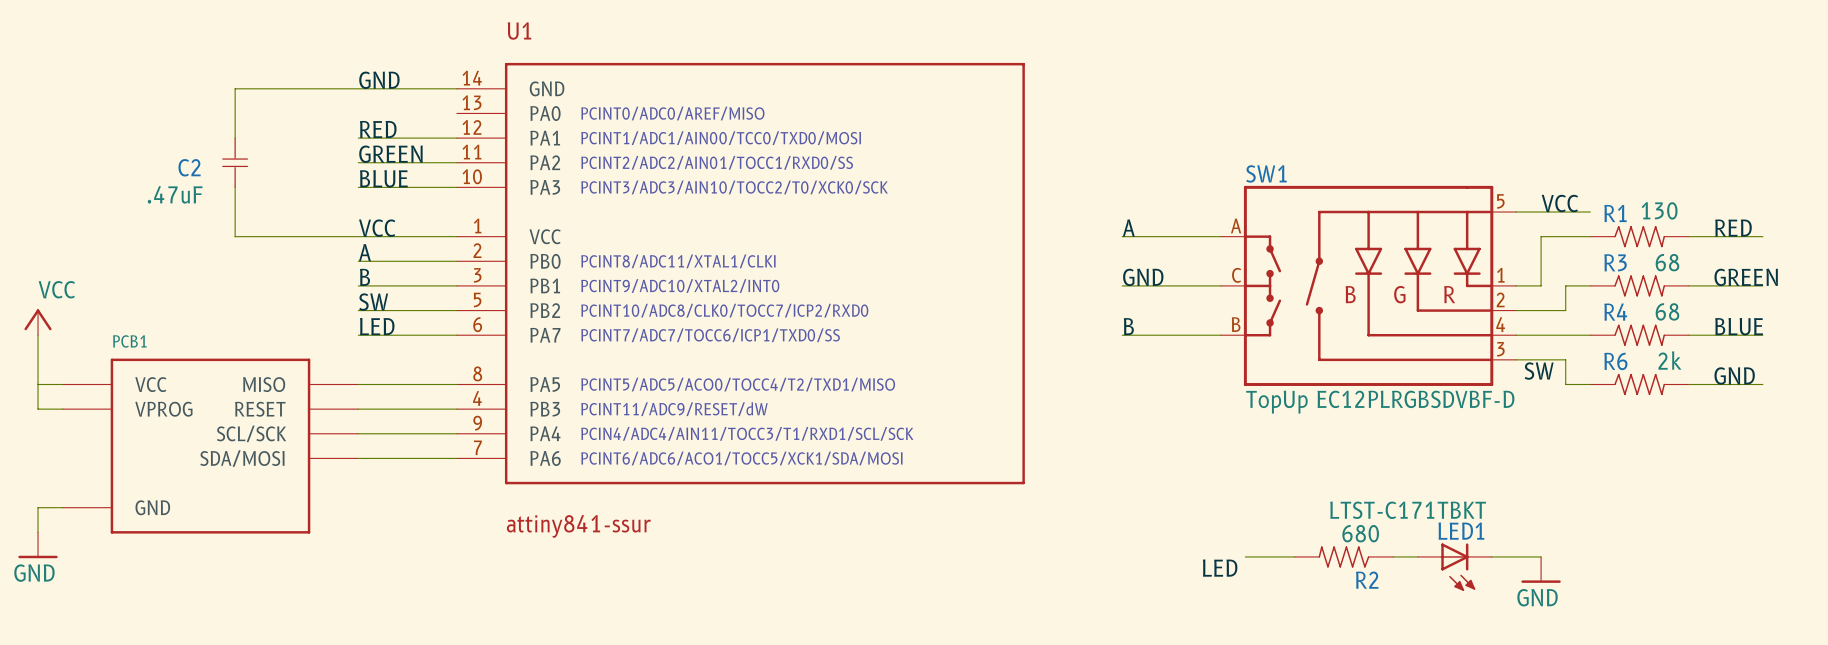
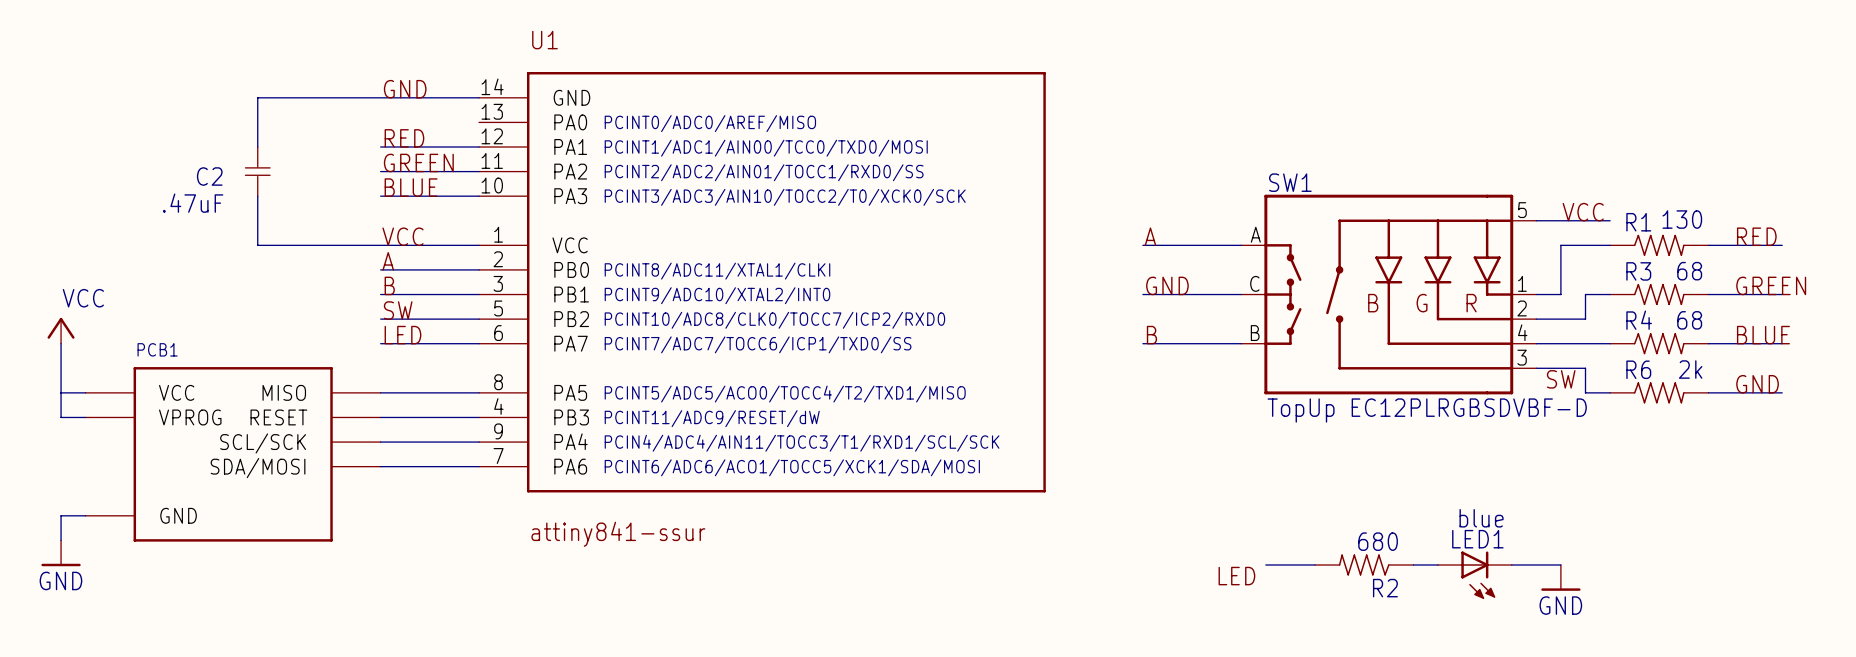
LED1 value: LTST-C171TBKT (1408, 510) -> blue (1481, 518)

